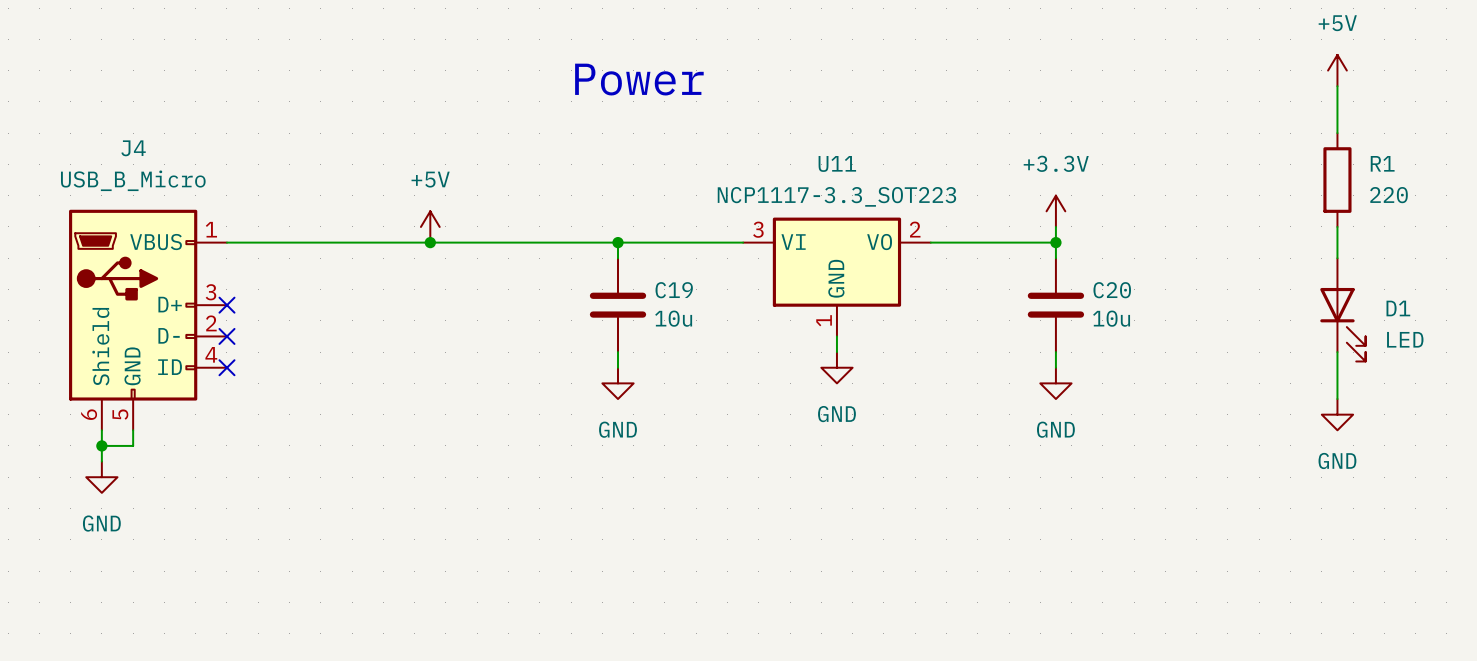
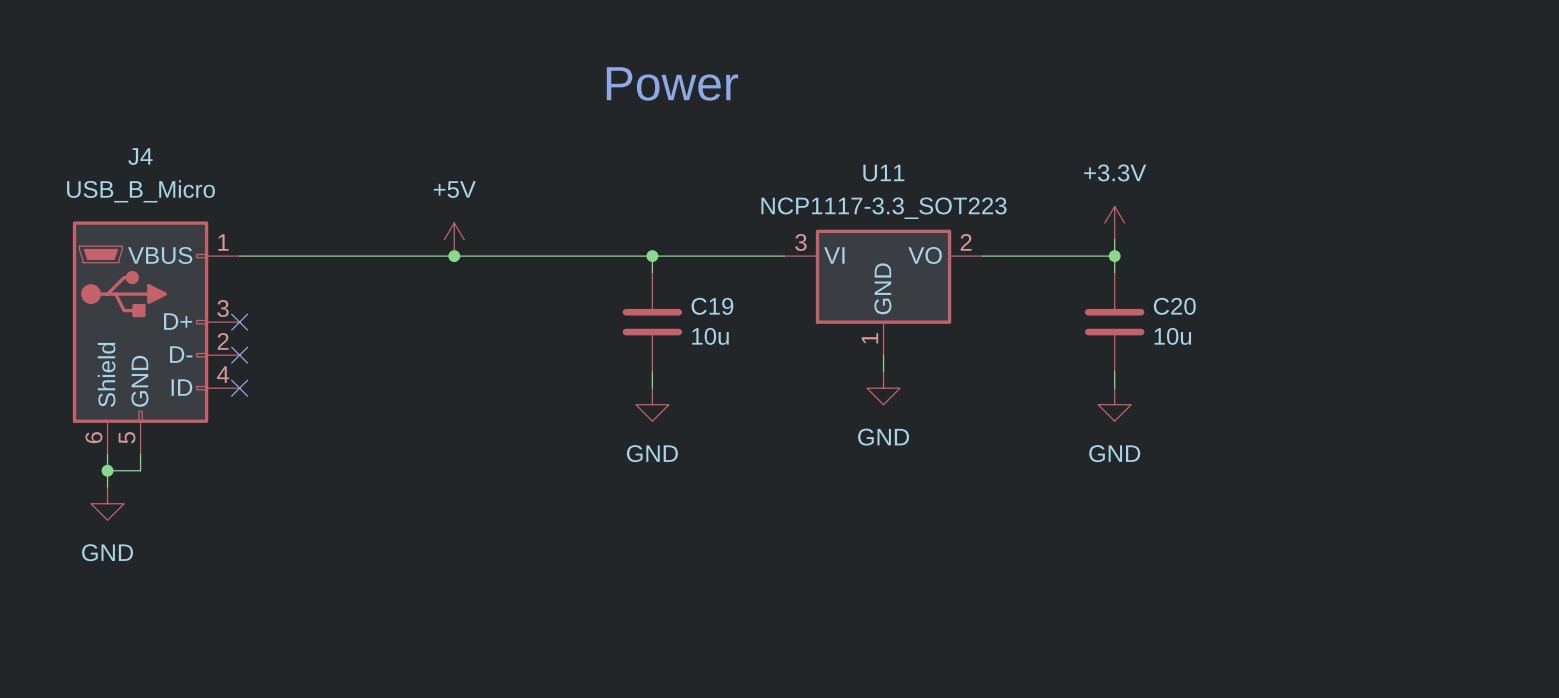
power symbol: +5V (1337, 70) -> none
wire: (1337, 86) (1337, 133) -> none
R1: 220 (1337, 180) -> none
wire: (1337, 226) (1337, 258) -> none
D1: LED (1342, 309) -> none
wire: (1337, 352) (1337, 399) -> none
power symbol: GND (1337, 414) -> none

